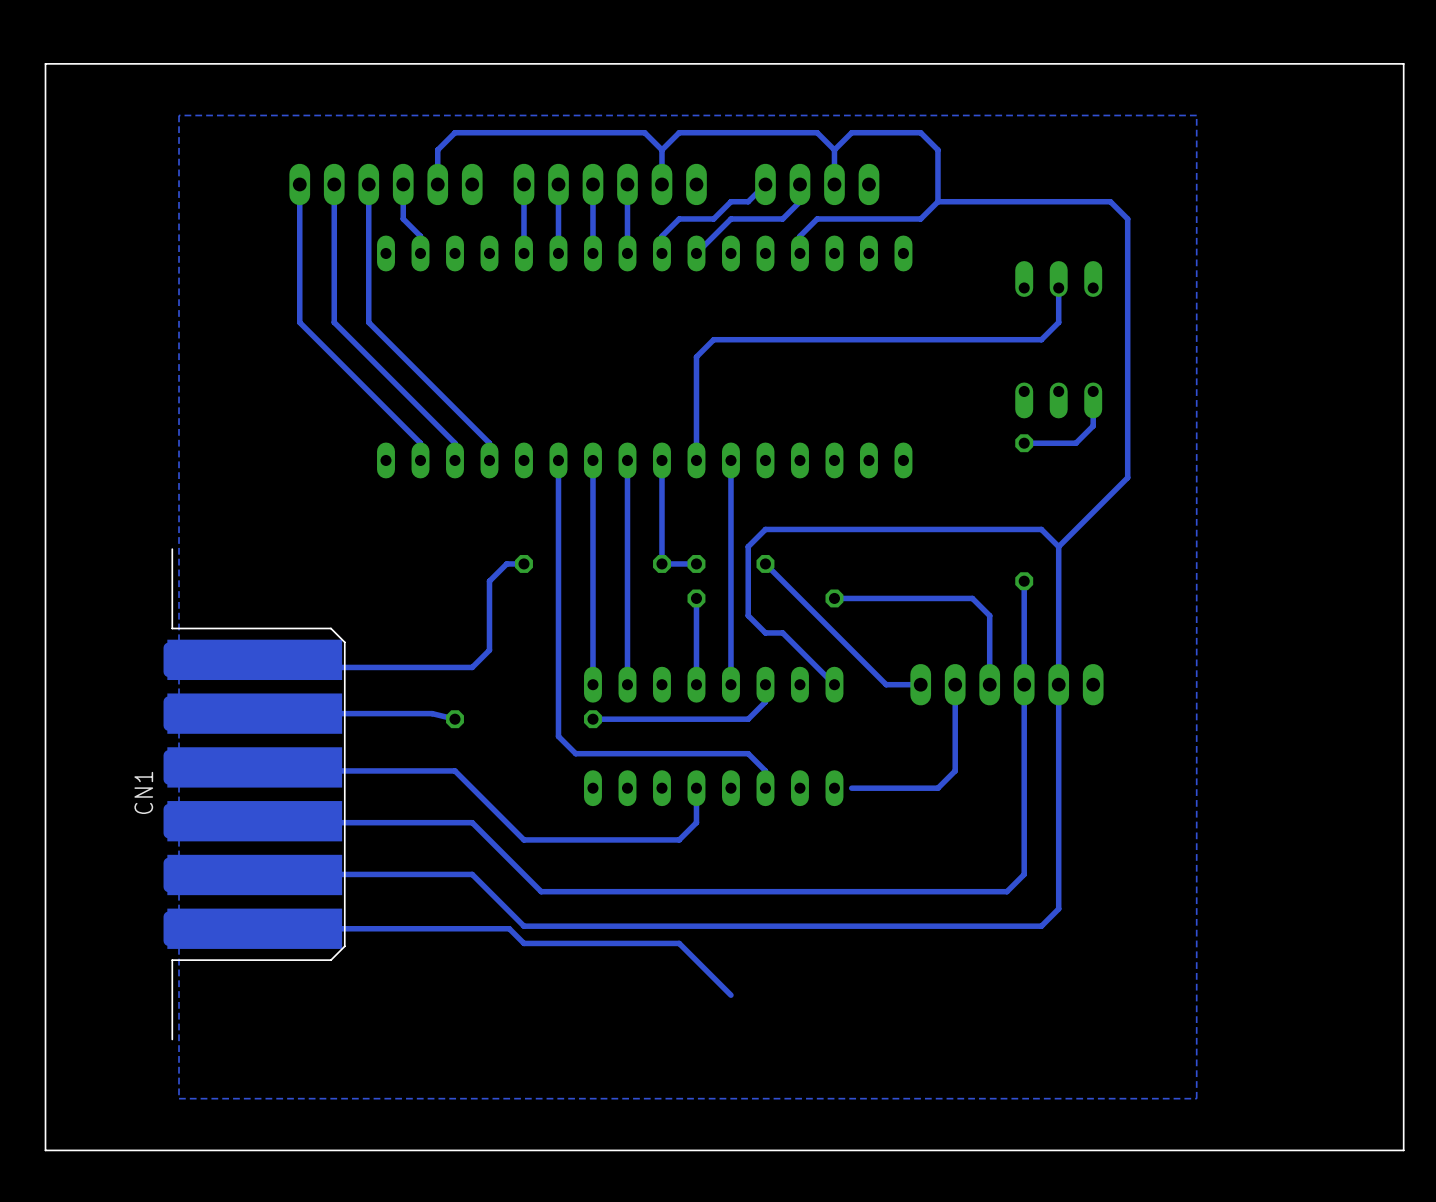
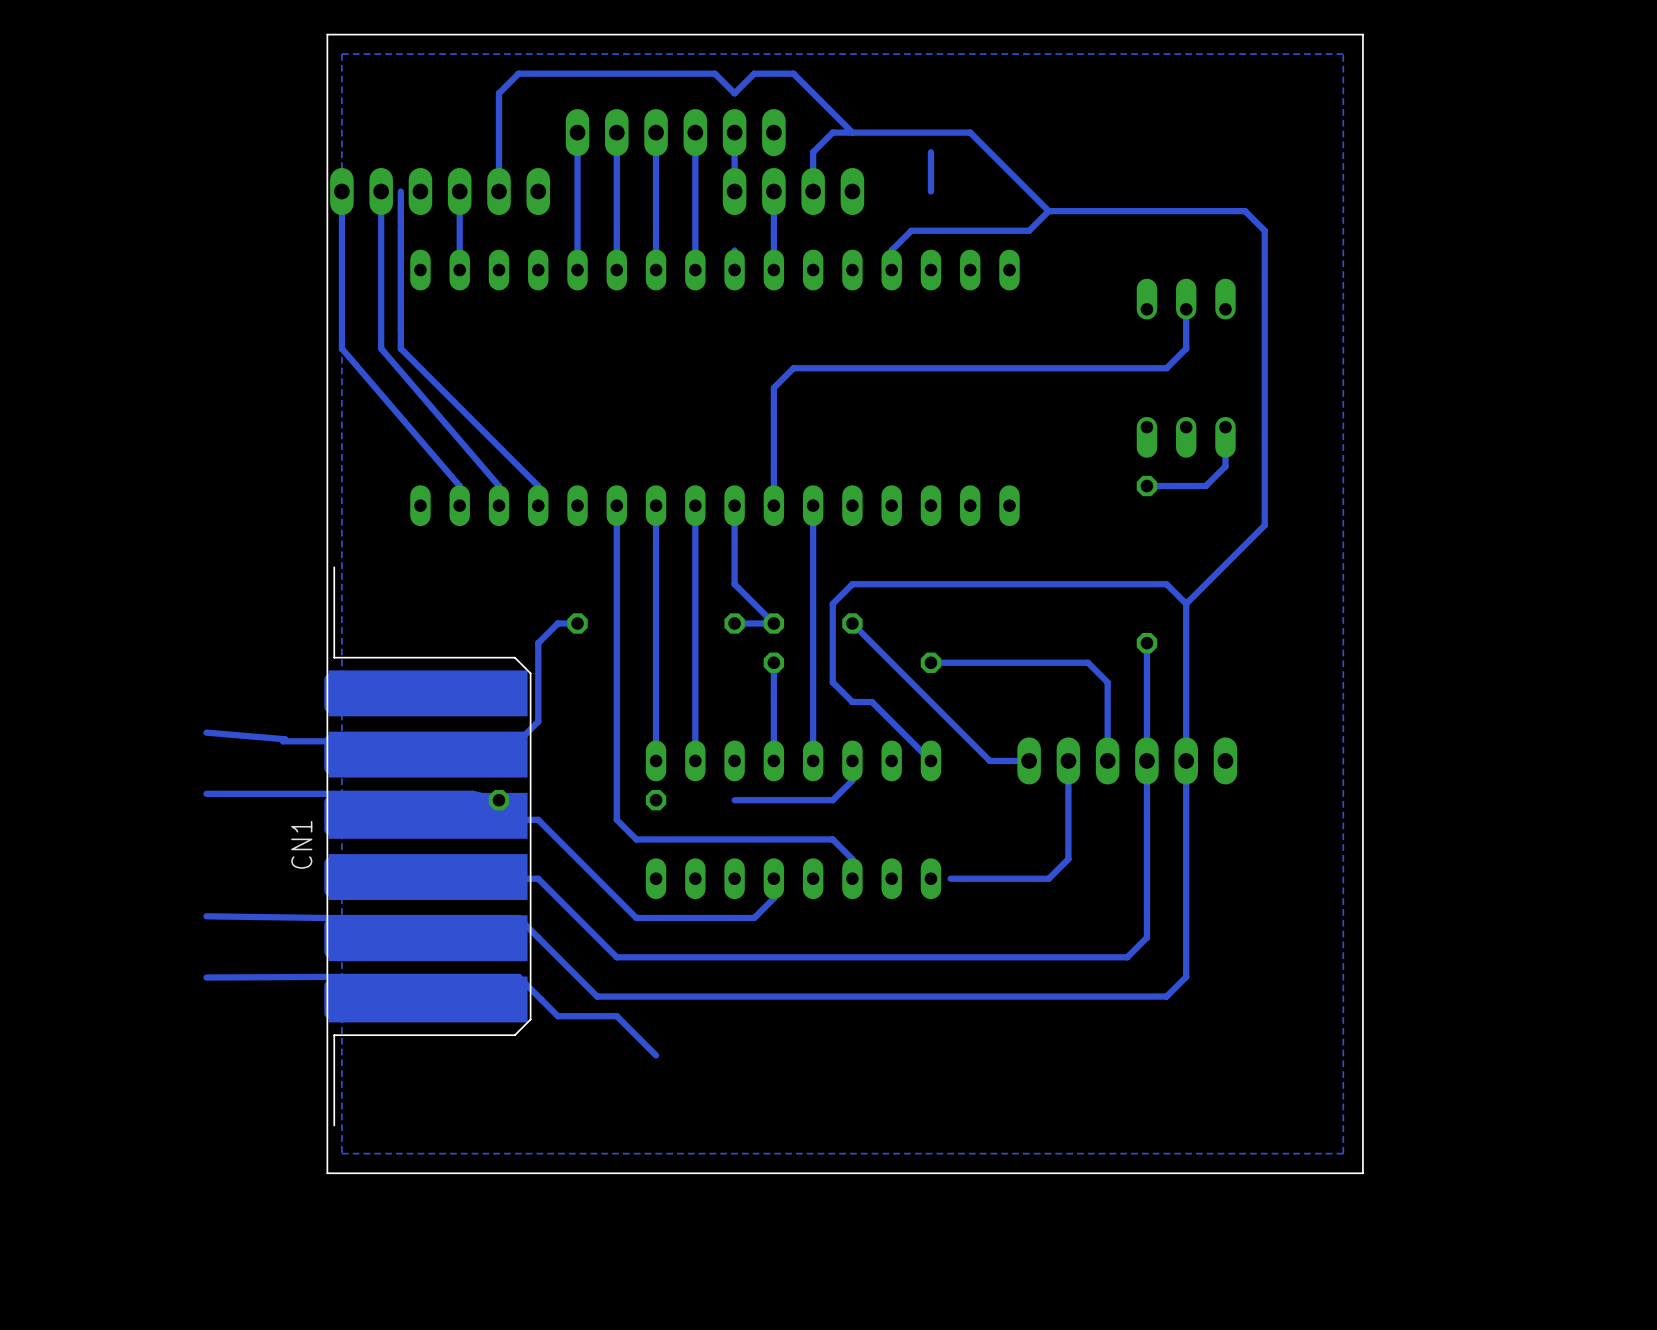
board edge: (1403, 63) (45, 63) (45, 1150) (1403, 1150) (1403, 63) -> (1362, 34) (1362, 1173) (327, 1173) (327, 34) (1362, 34)
zone outline: (1196, 115) (179, 115) (179, 1098) (1196, 1098) (1196, 1029) -> (1343, 112) (1343, 54) (341, 54) (341, 1153) (1343, 1153)
track: none -> (577, 132) (577, 191)
track: none -> (616, 132) (616, 191)
track: none -> (656, 132) (656, 191)
track: none -> (695, 132) (695, 191)
track: (748, 132) (679, 132) (661, 149) (644, 132) (454, 132) (437, 149) (437, 184) -> (832, 132) (813, 152) (813, 191)
track: none -> (852, 132) (793, 73) (754, 73) (734, 93) (714, 73) (518, 73) (498, 93) (498, 191)
track: (851, 132) (834, 149) (817, 132) -> (950, 132) (911, 132)
track: (868, 132) (920, 132) (937, 149) (937, 201) -> (970, 132) (1048, 211)
track: (299, 184) (299, 322) (420, 443) -> (341, 191) (341, 348) (459, 486)
track: (334, 184) (334, 322) (454, 443) -> (381, 191) (381, 348) (498, 486)
part position: (386, 184) -> (440, 191)
track: (403, 184) (403, 218) (420, 236) -> (459, 191) (459, 250)
part position: (610, 184) -> (675, 132)
track: (765, 184) (748, 201) (730, 201) (713, 218) (679, 218) (661, 236) -> none
track: (799, 184) (799, 201) (782, 218) (730, 218) (696, 253) -> (773, 191) (773, 270)
part position: (817, 184) -> (793, 191)
track: (661, 529) (661, 563) -> (734, 584) (773, 623)
track: (661, 719) (592, 719) -> none
track: (198, 767) (305, 770) (454, 770) (523, 839) (679, 839) (696, 822) (696, 805) -> (363, 815) (367, 819) (538, 819) (636, 918) (754, 918) (773, 898)
track: none -> (361, 859) (345, 878) (363, 877) (365, 878) (538, 878) (616, 957) (1127, 957) (1146, 937)
CN1 position: (254, 794) -> (427, 846)
track: (1024, 839) (1024, 874) (1006, 891) -> (1186, 976) (1166, 996) (1127, 996)
track: (1058, 874) (1058, 908) (1041, 926) (523, 926) (506, 908) -> (656, 1055) (616, 1016) (557, 1016)
track: (198, 928) (509, 928) (523, 943) (679, 943) (730, 995) -> none

